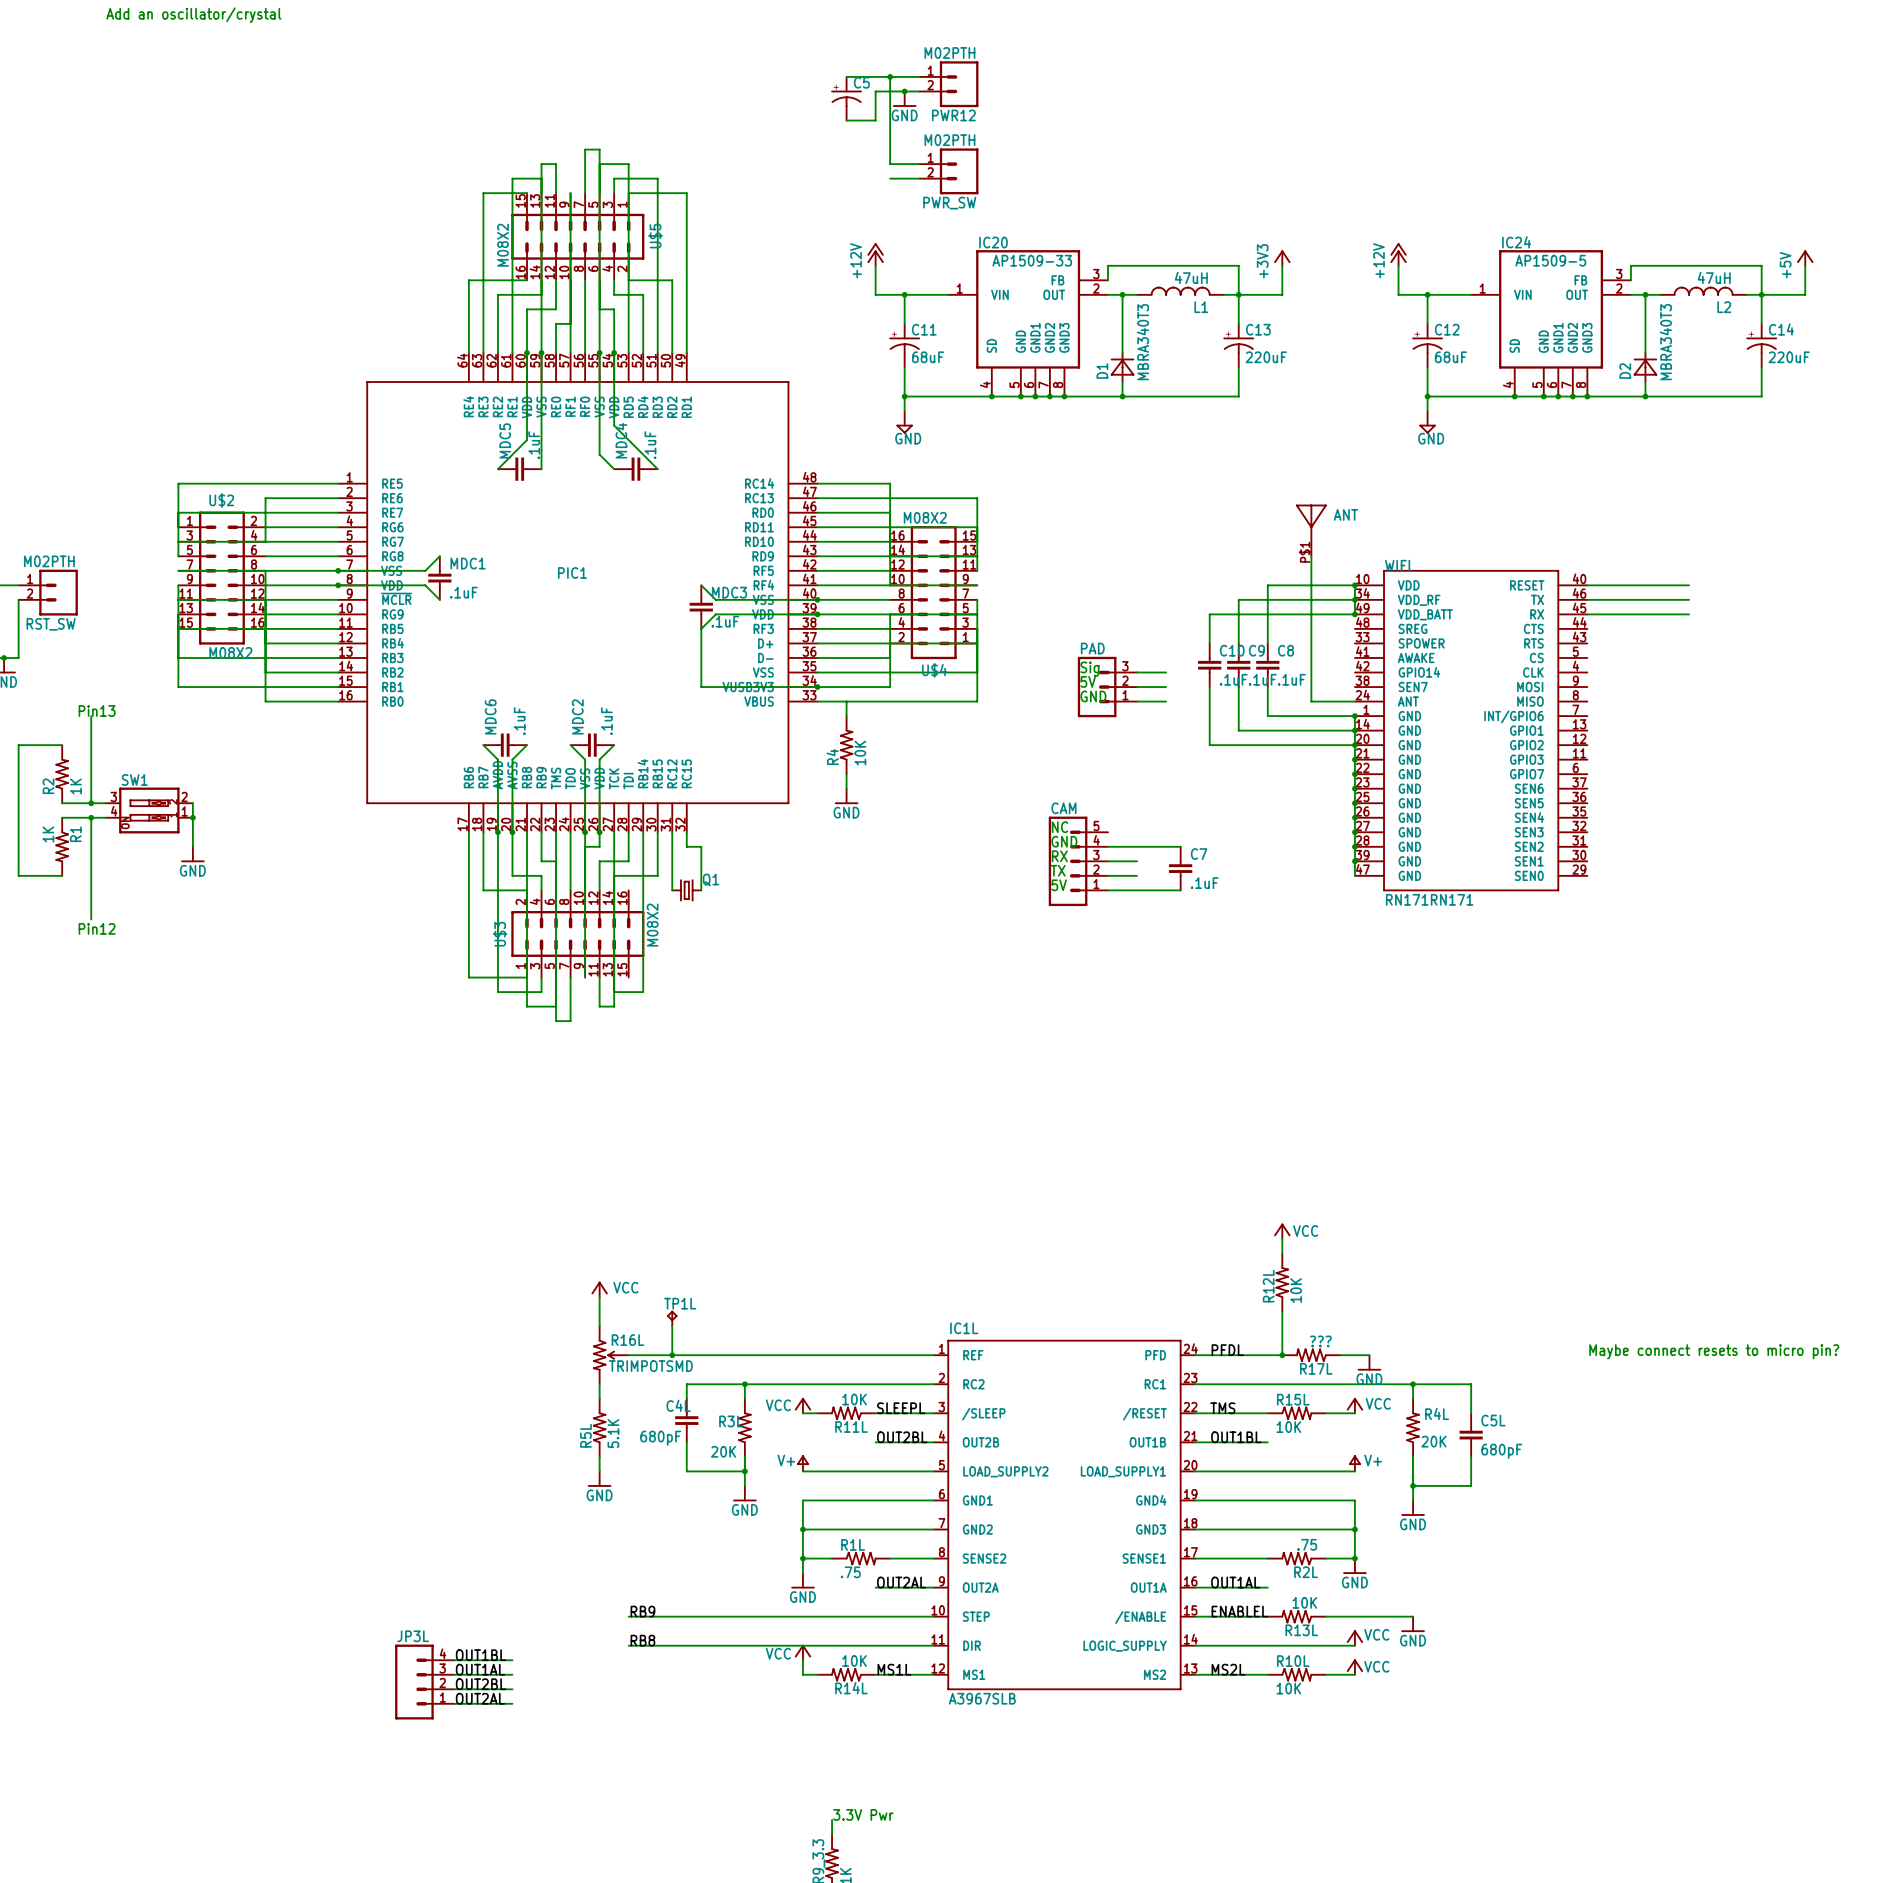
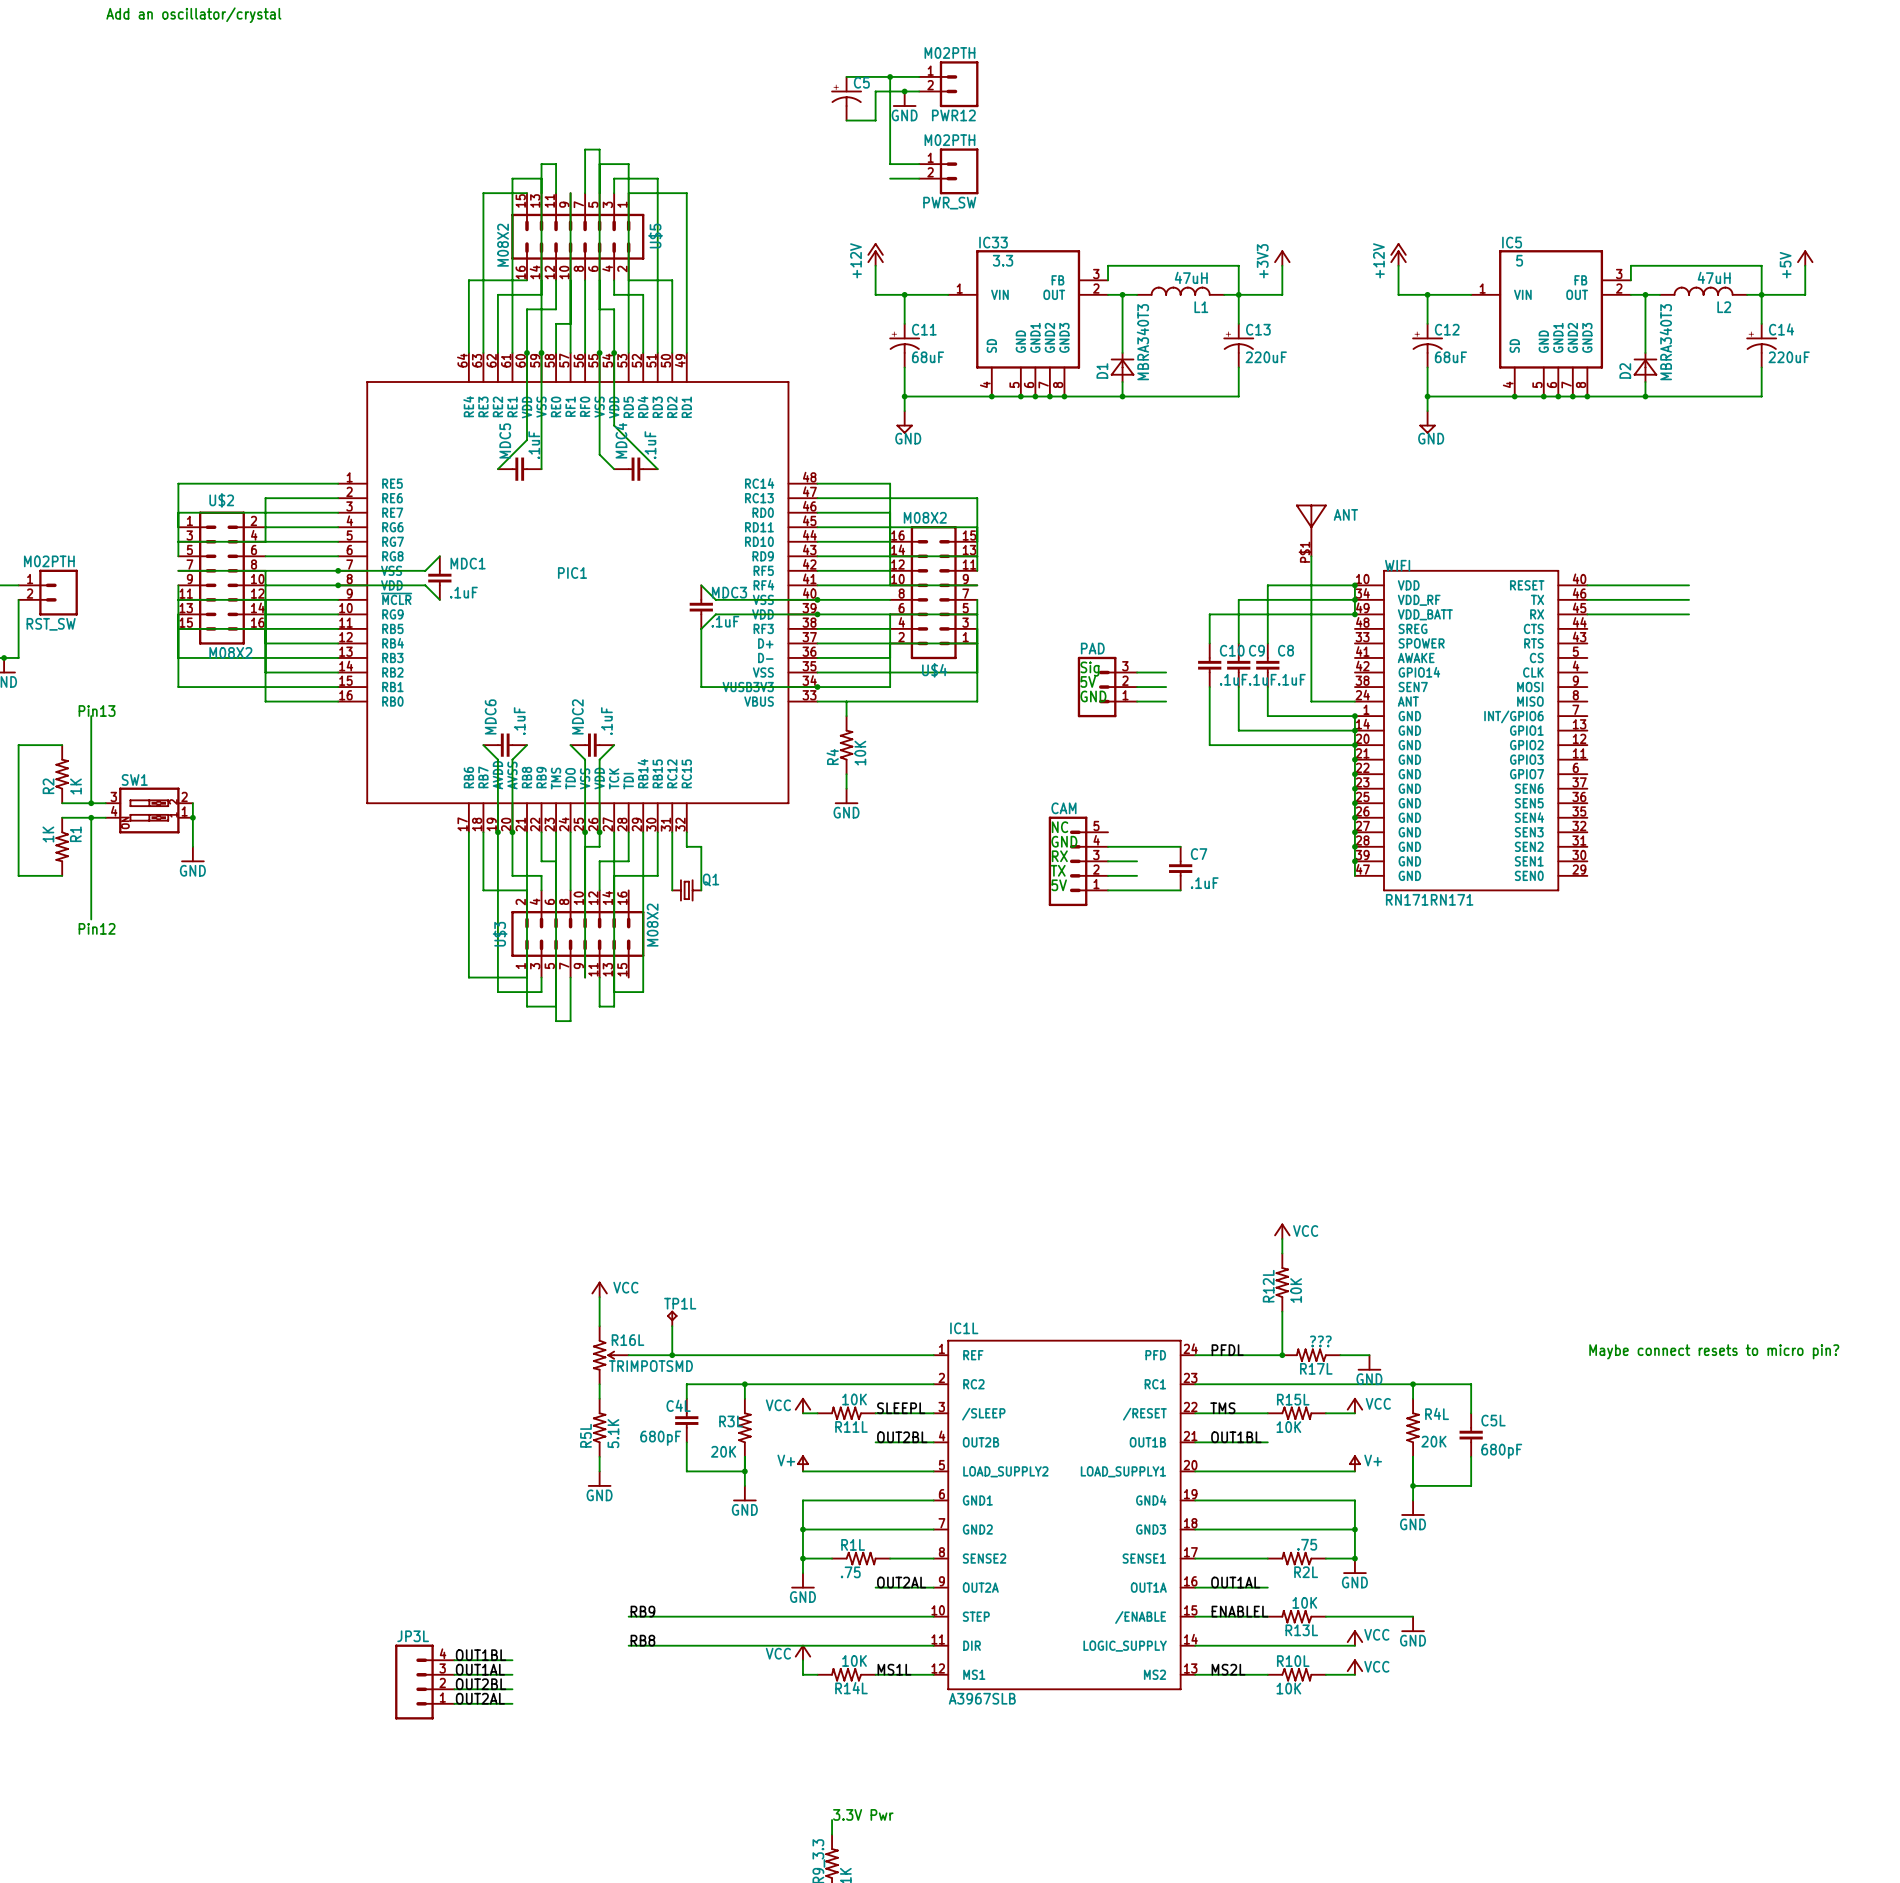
IC20 name: IC20 (993, 242) -> IC33 (993, 242)
IC24 name: IC24 (1516, 242) -> IC5 (1512, 242)
IC20 value: AP1509-33 (1032, 260) -> 3.3 (1003, 260)
IC24 value: AP1509-5 (1550, 260) -> 5 (1519, 260)

